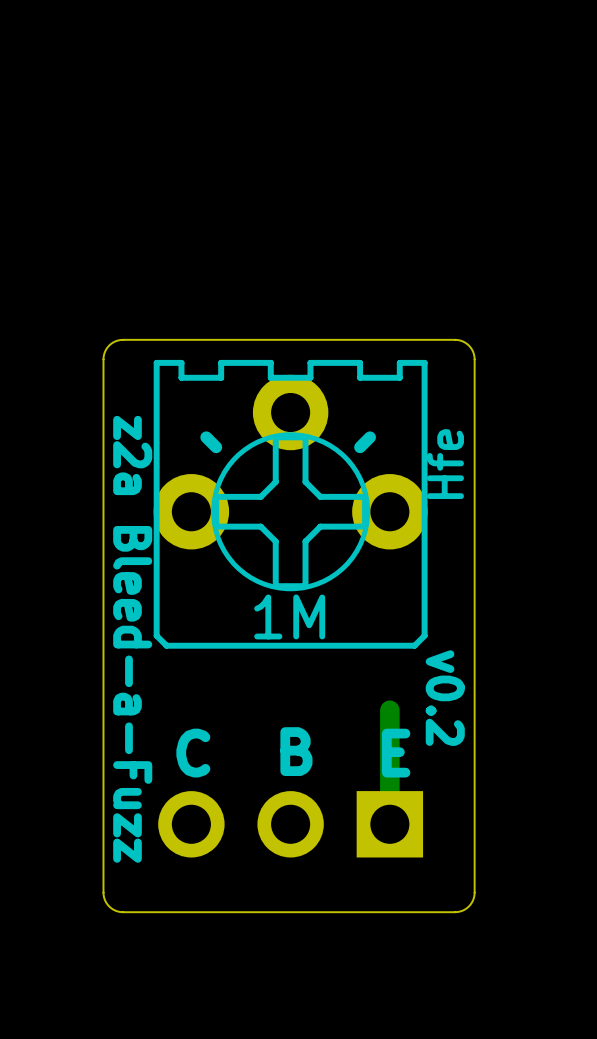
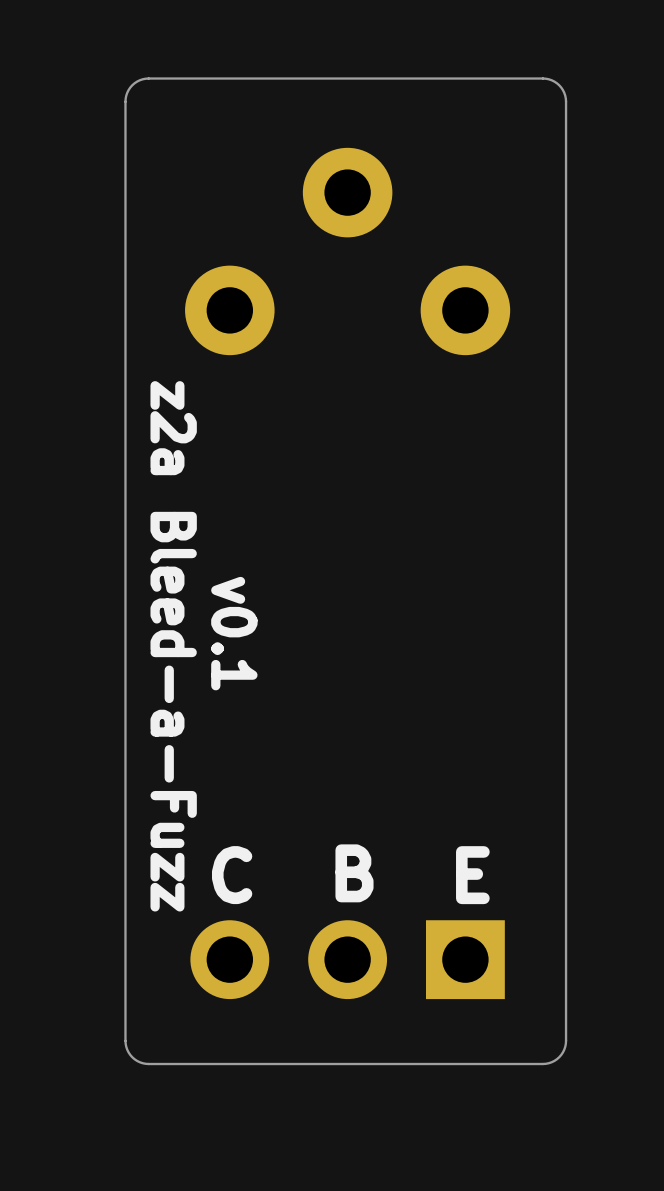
board edge: (474, 359) (468, 345) (455, 339) (123, 339) (109, 345) (103, 359) -> (566, 407) (565, 98) (559, 85) (551, 80) (542, 78) (148, 78) (134, 83) (128, 90) (125, 101) (125, 407)
part side: bottom (290, 504) -> top (347, 251)
text: none -> v0.1 (234, 633)
text position: z2a Bleed-a-Fuzz (132, 639) -> z2a Bleed-a-Fuzz (173, 646)
text: v0.2 (445, 698) -> none
track: (389, 710) (389, 824) -> none

